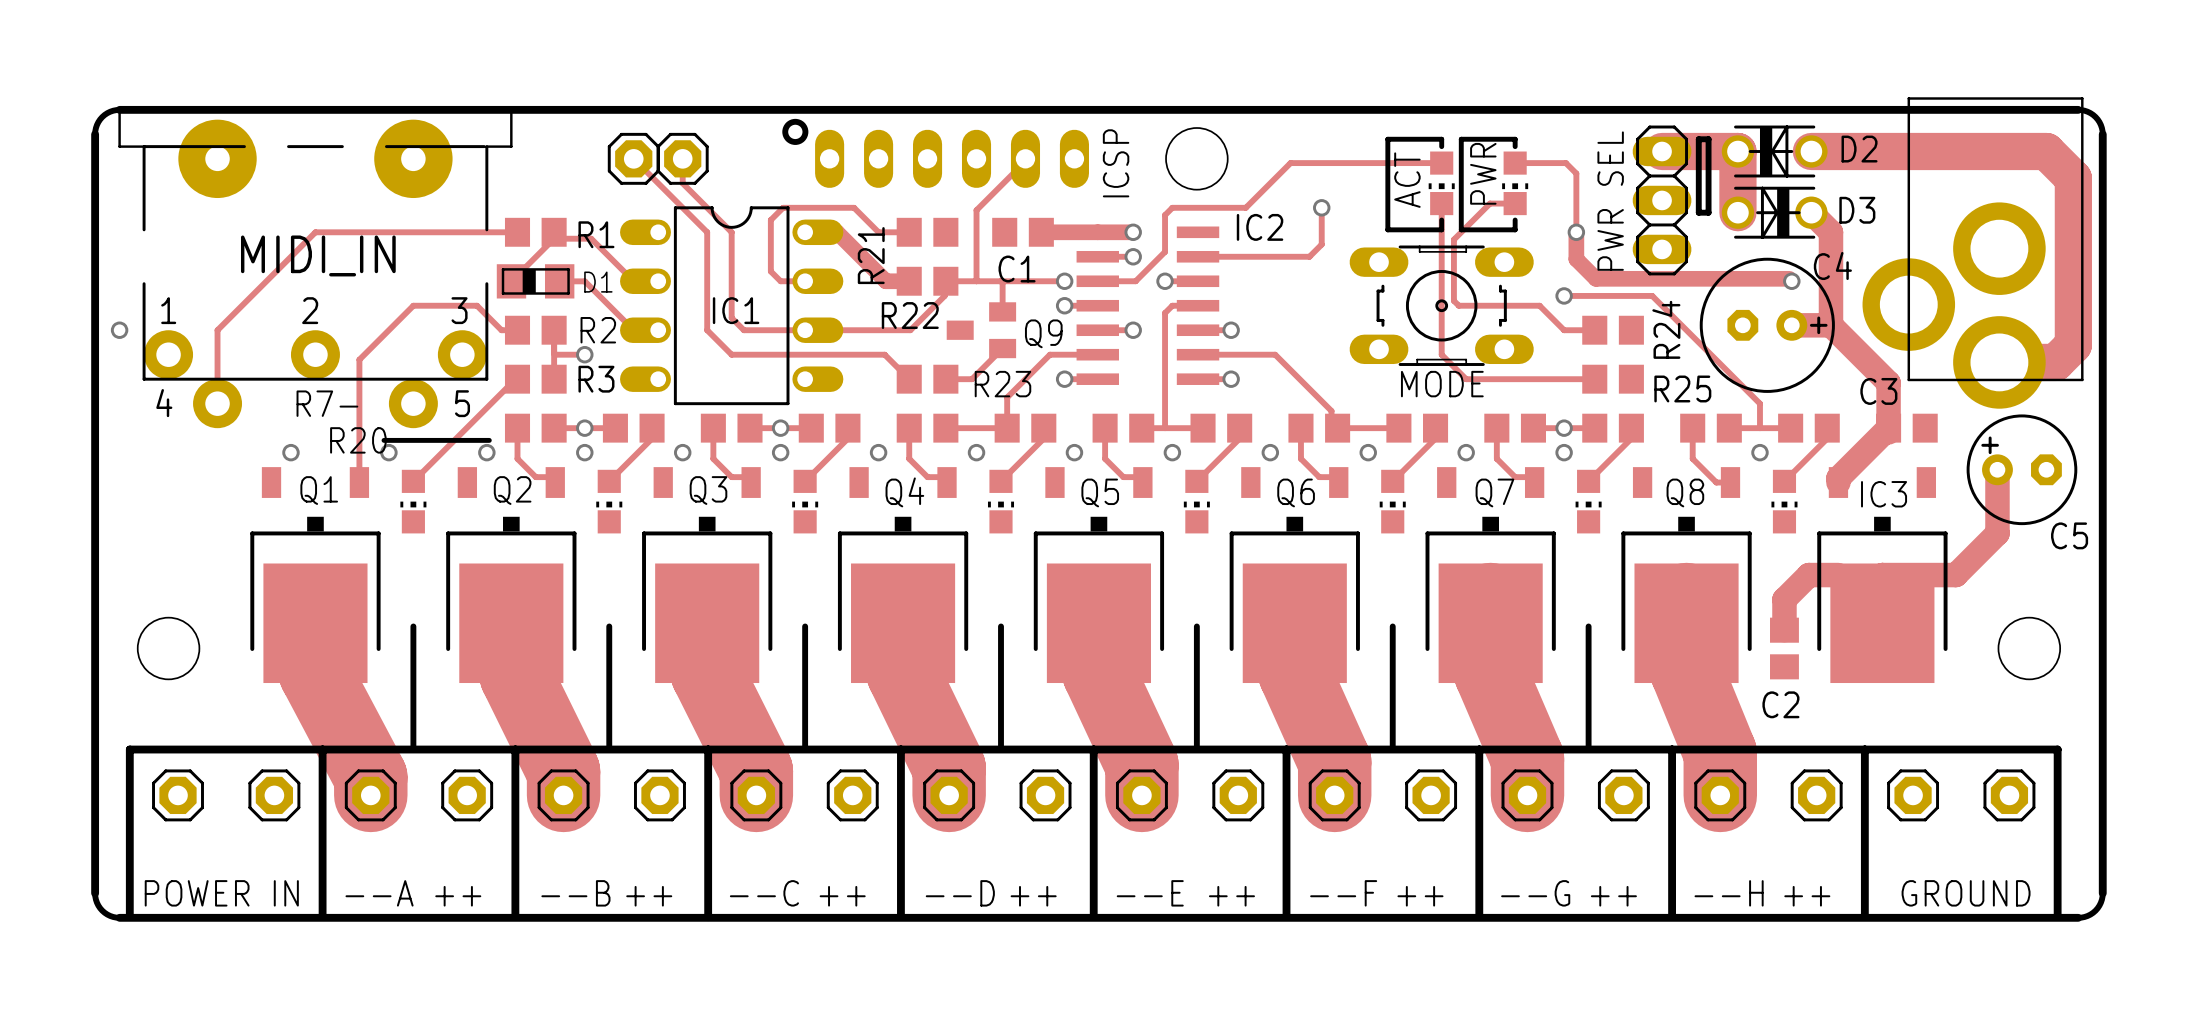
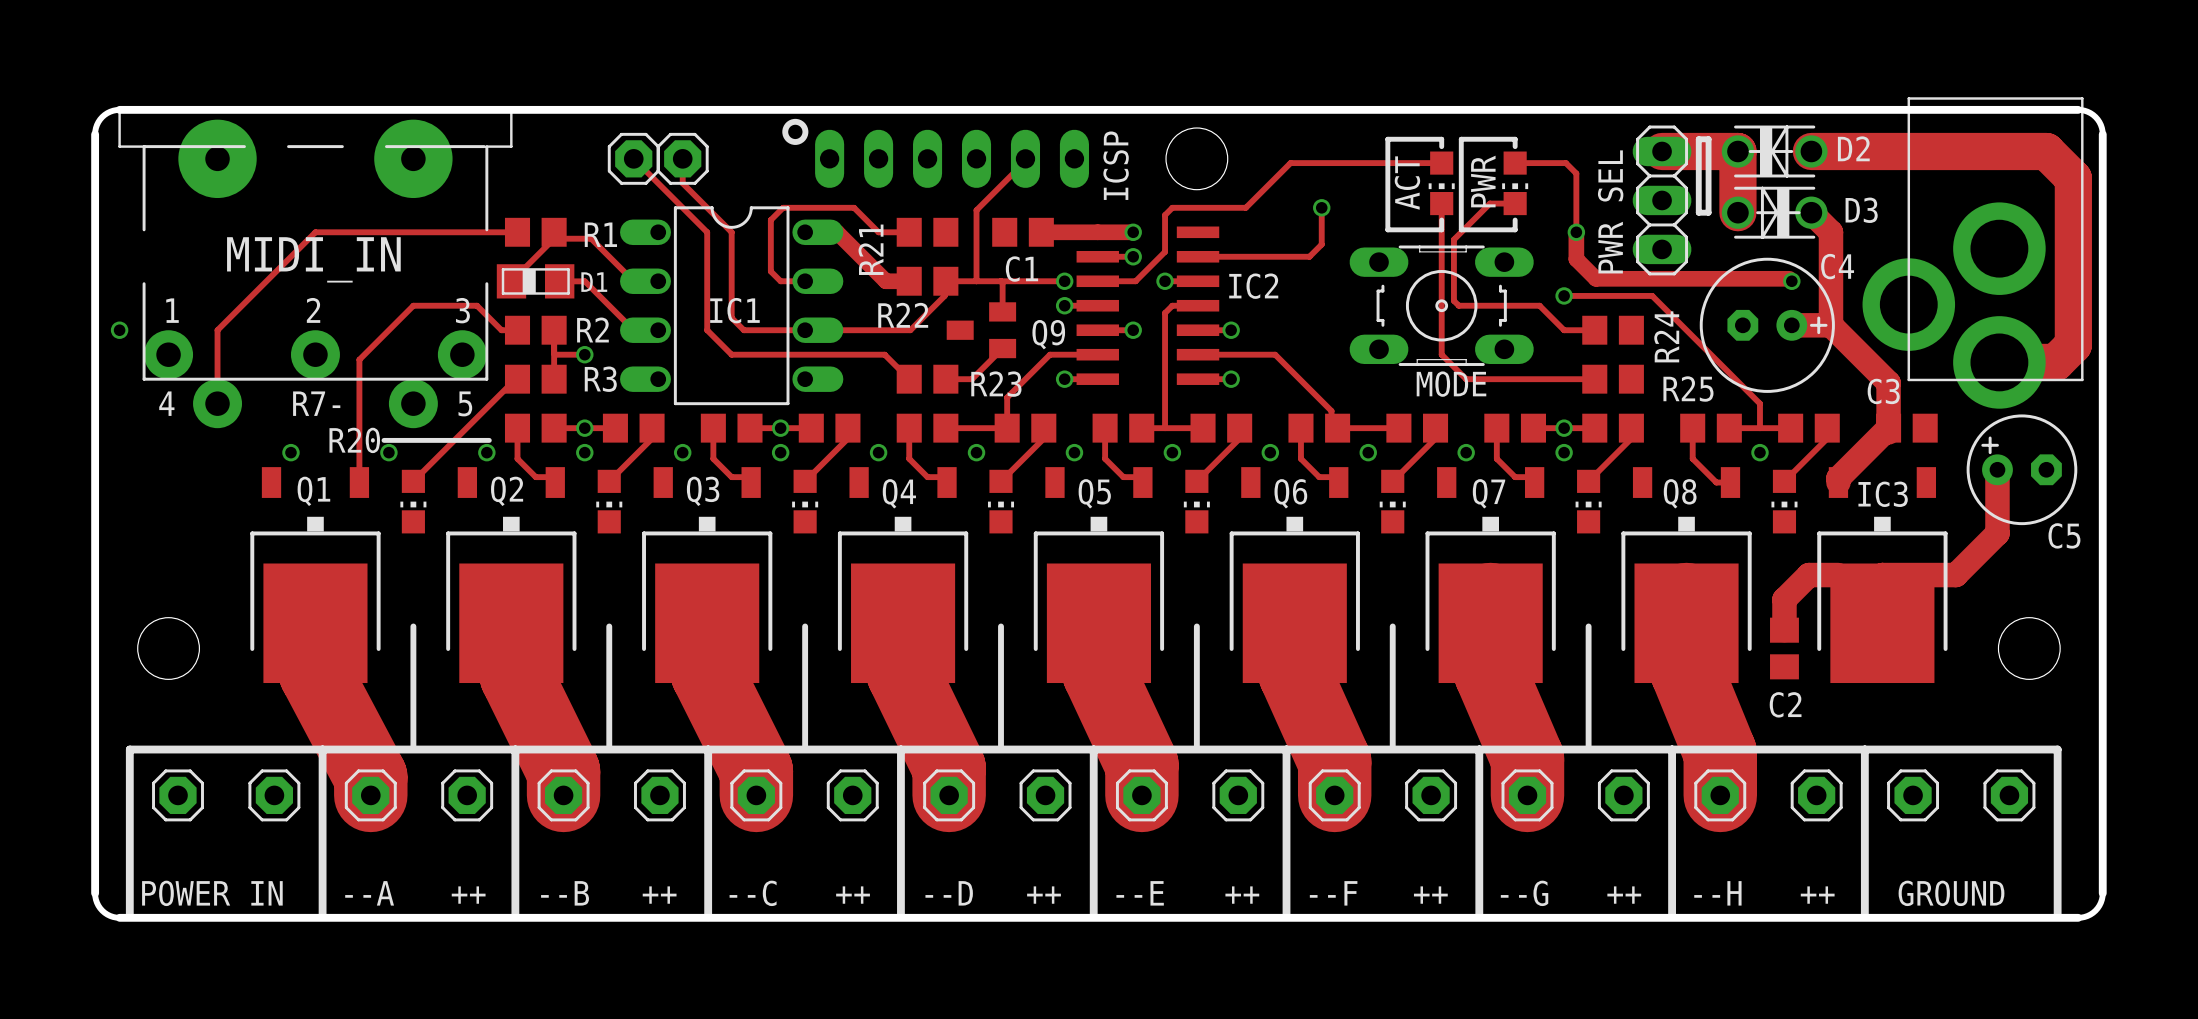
IC2 name position: IC2 (1260, 227) -> IC2 (1253, 286)

